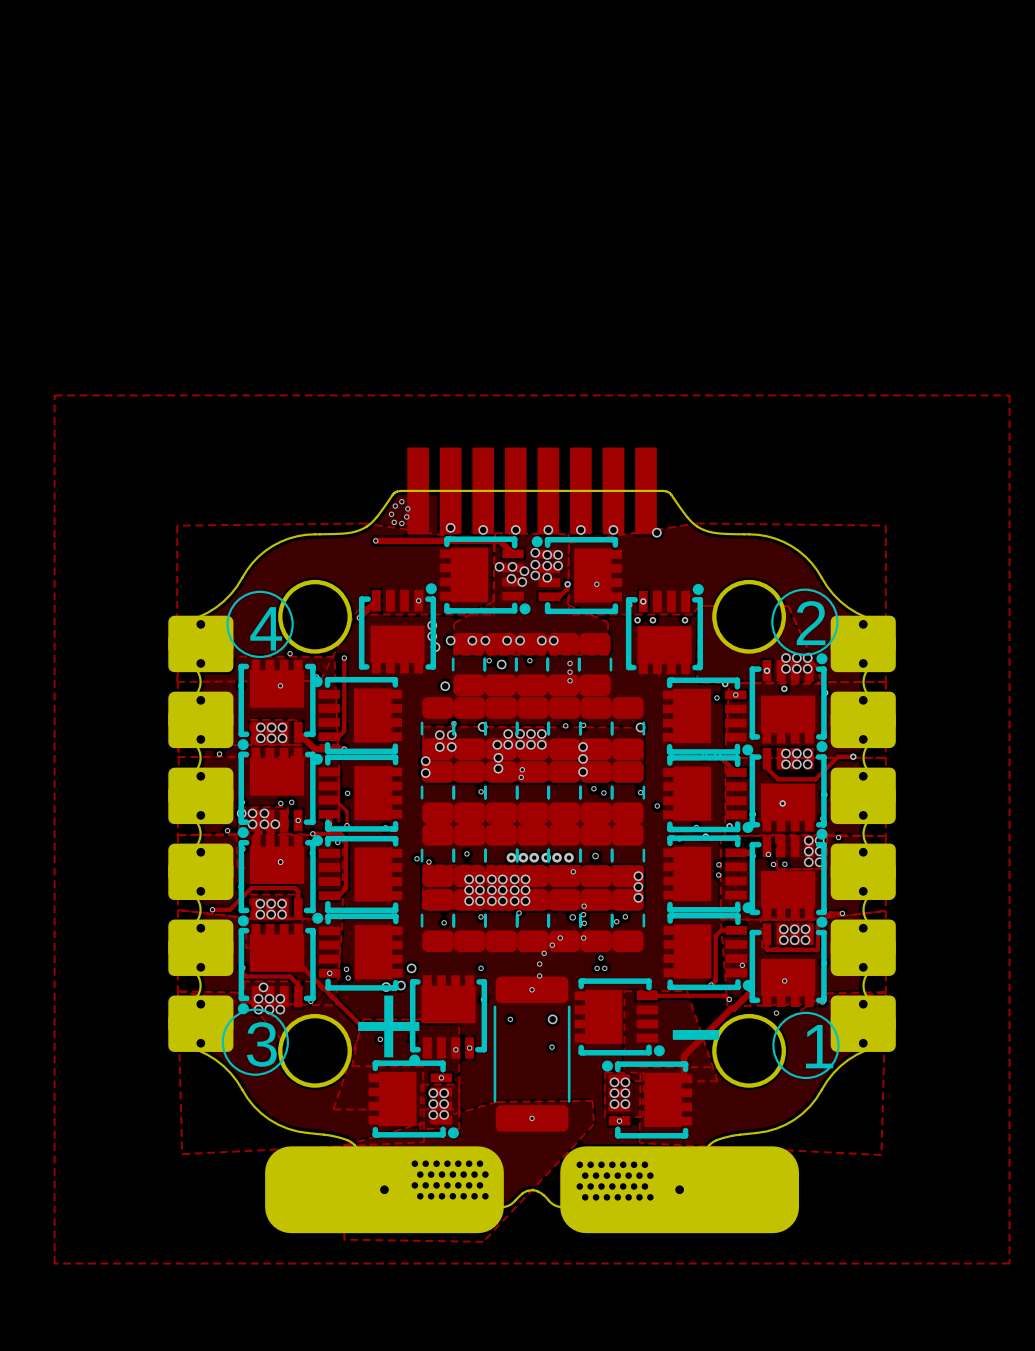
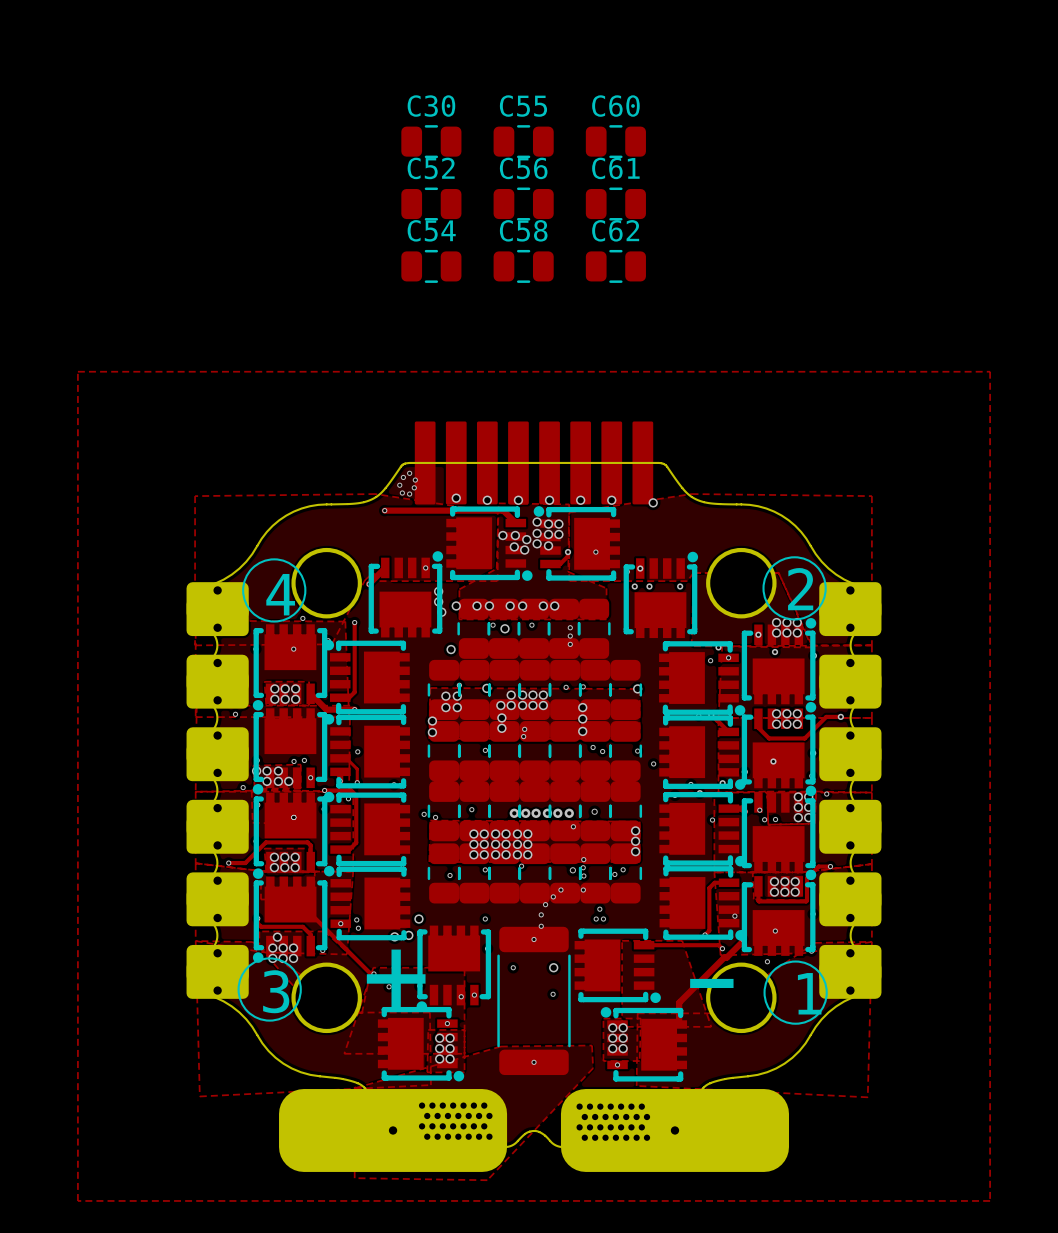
C30: none -> (431, 141)
C55: none -> (523, 141)
C60: none -> (615, 141)
C52: none -> (431, 204)
C56: none -> (523, 204)
C61: none -> (615, 204)
C54: none -> (431, 266)
C58: none -> (523, 266)
C62: none -> (615, 266)
via: (718, 875) -> none

